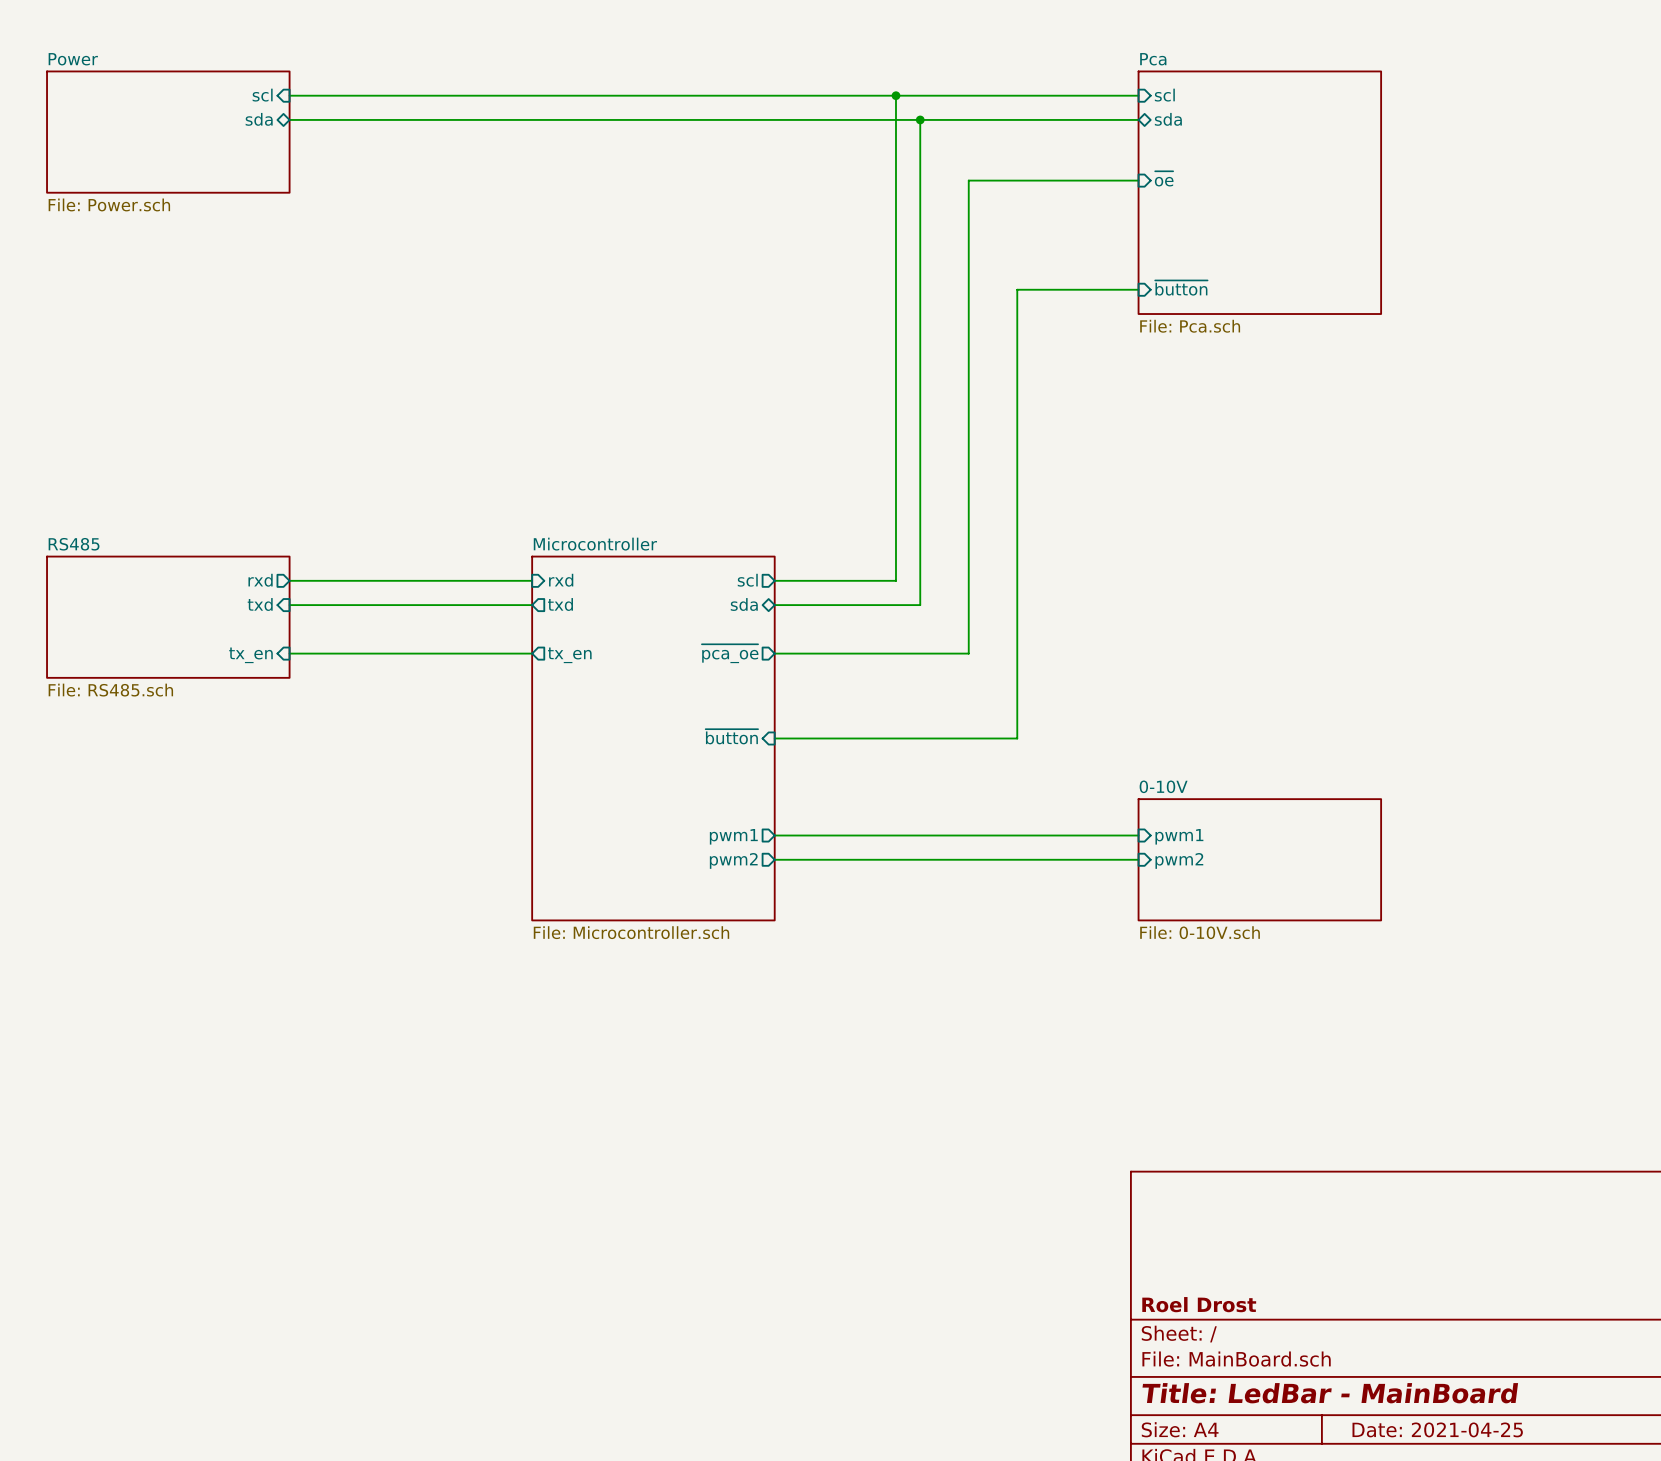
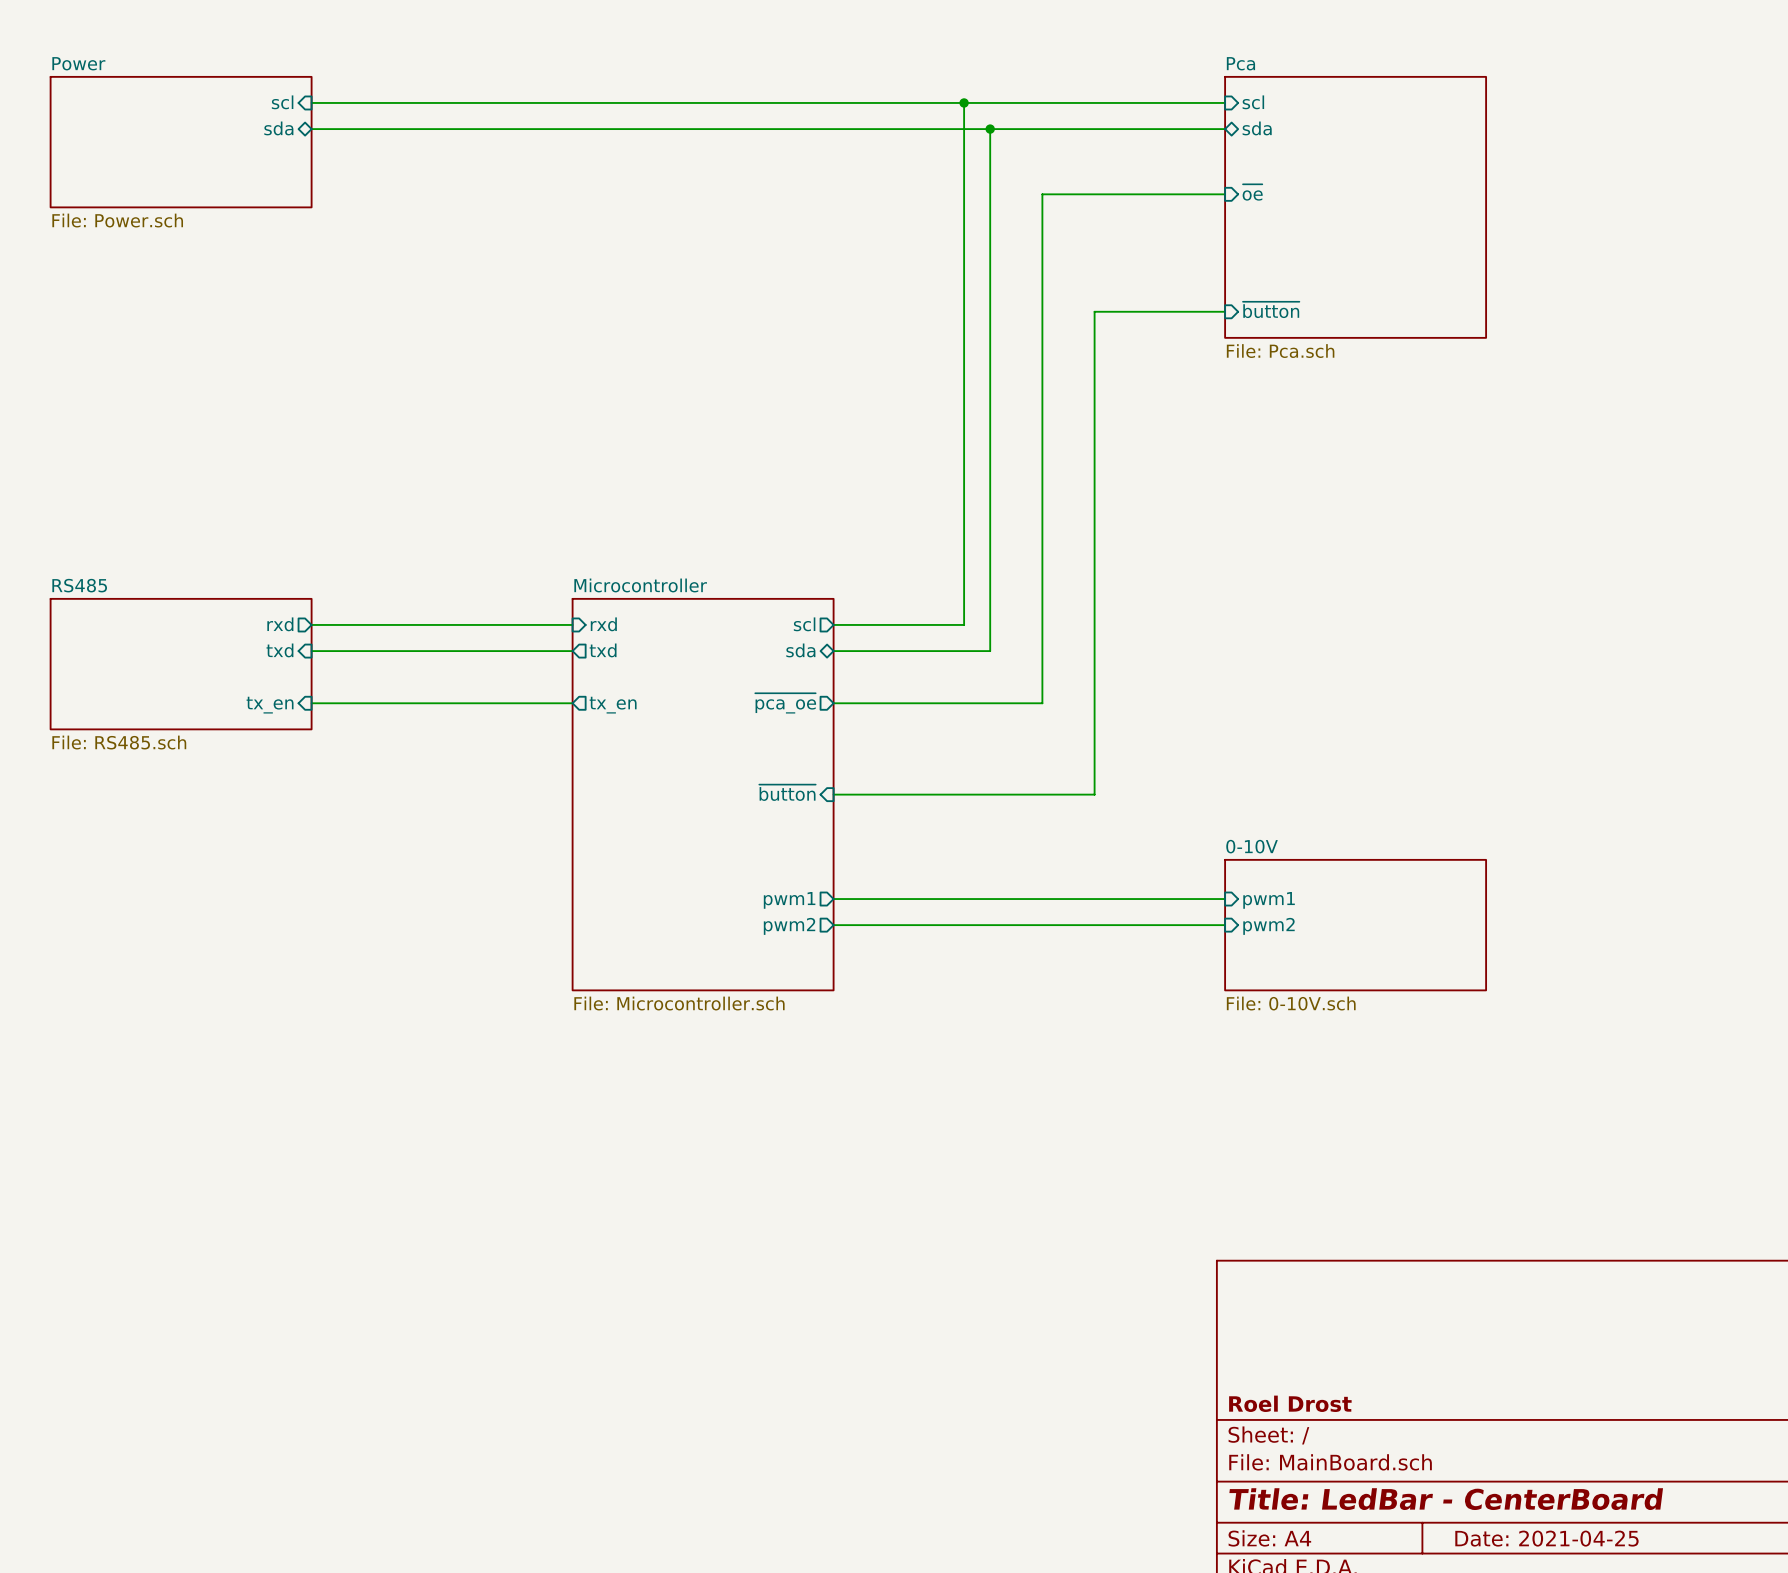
title block: Title: LedBar - MainBoard (1330, 1393) -> Title: LedBar - CenterBoard (1446, 1499)

